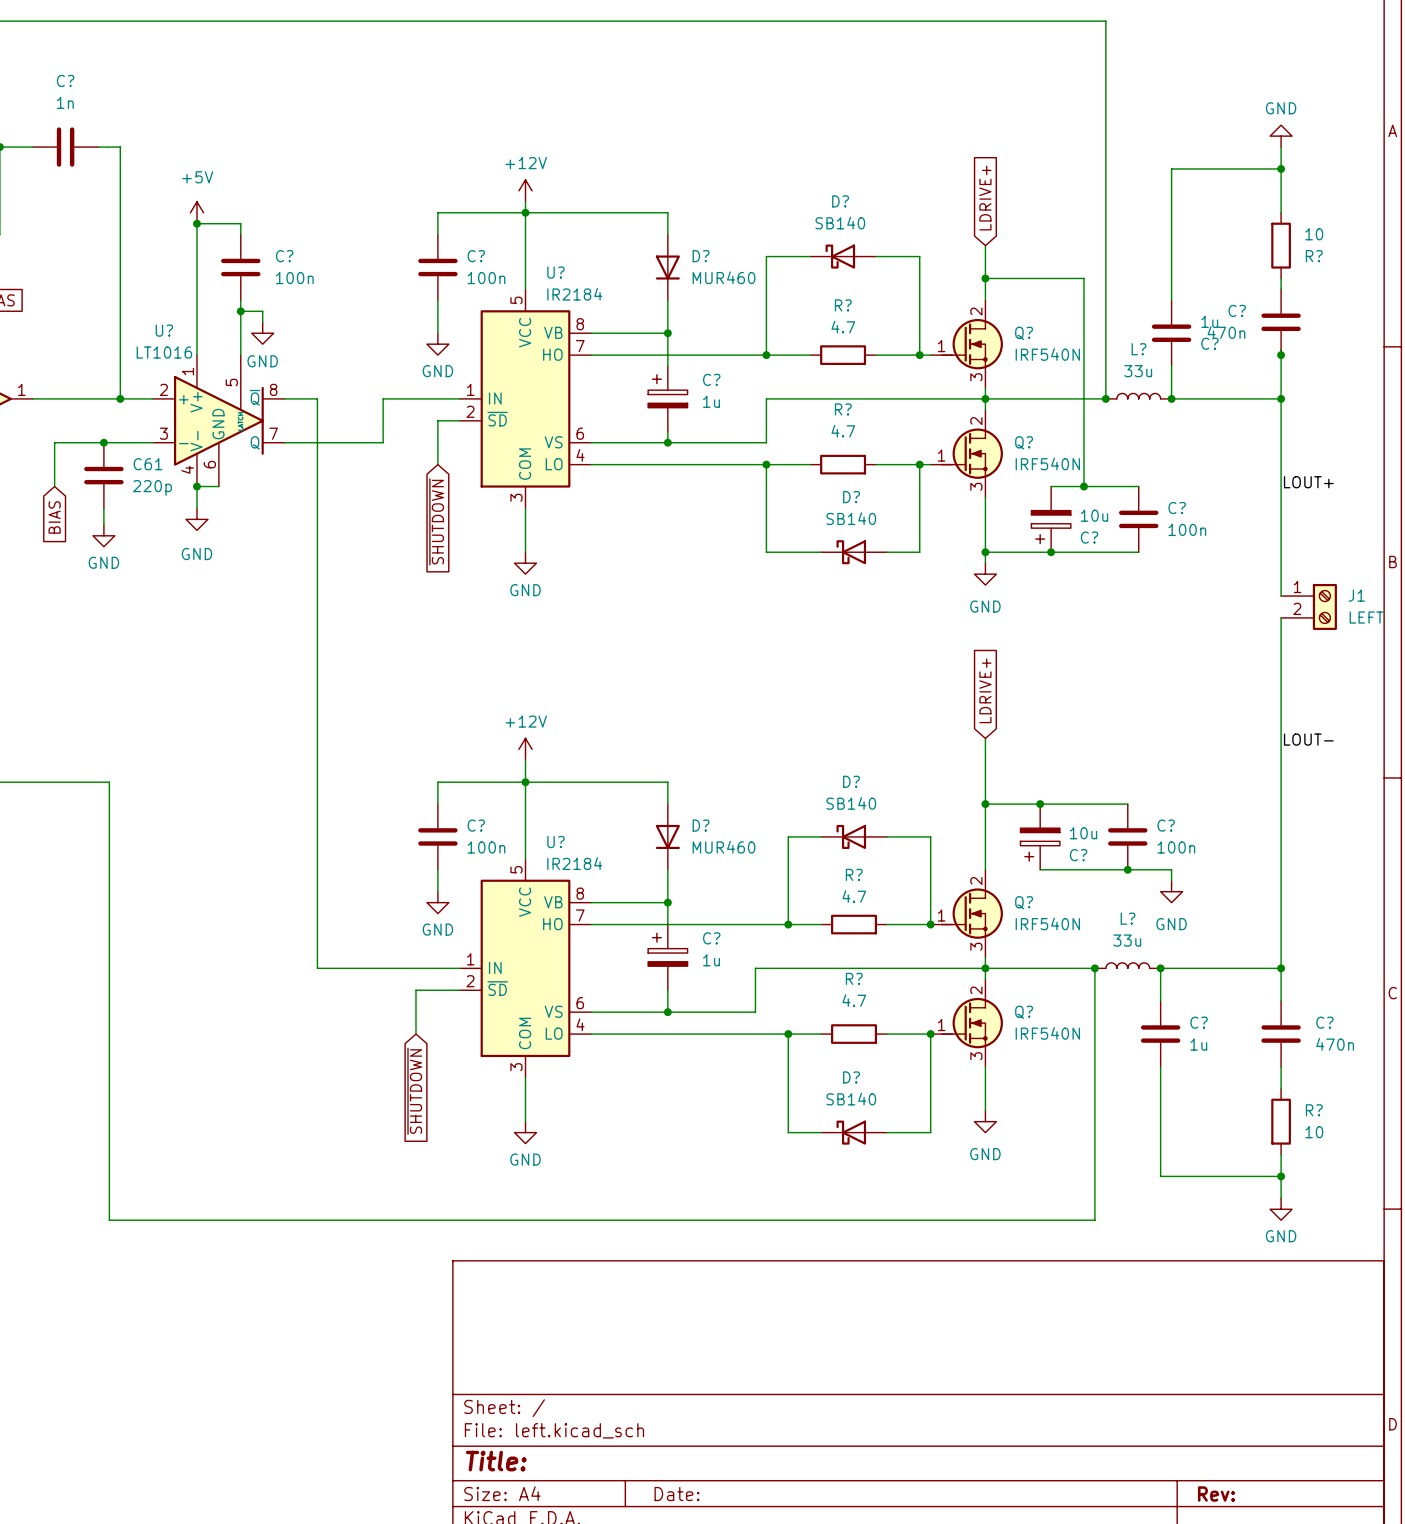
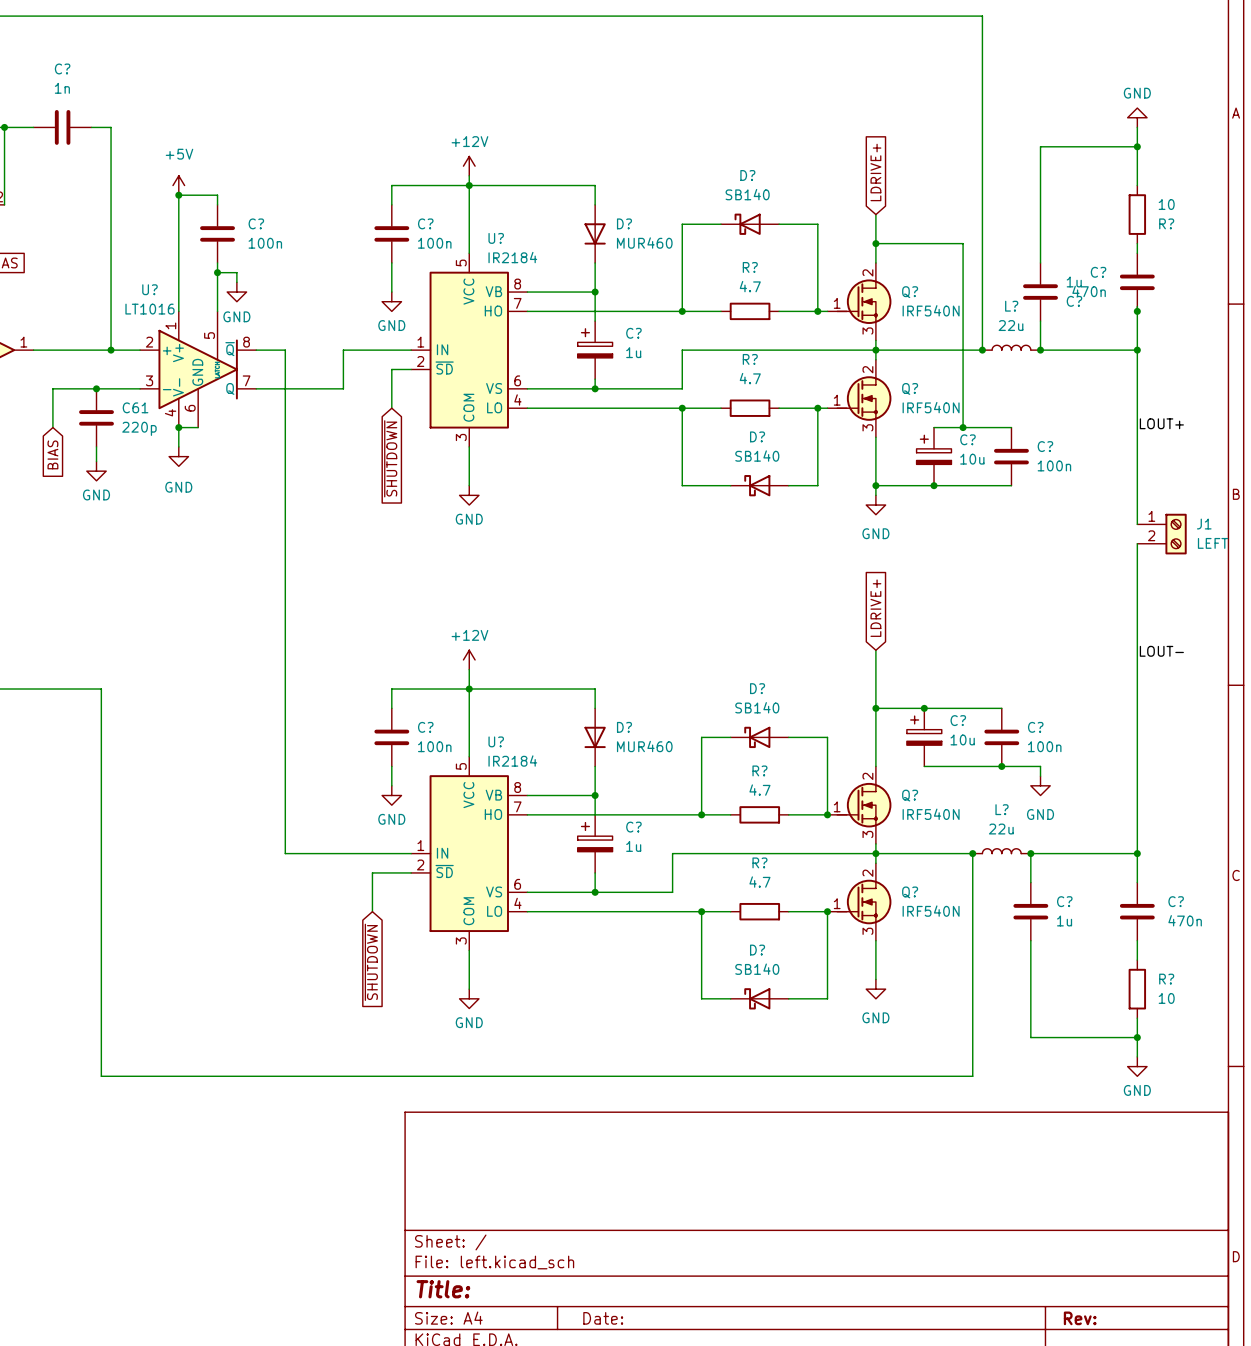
L? value: 33u (1138, 371) -> 22u (1011, 325)
C? flip: as is (1051, 527) -> up-down (934, 449)
C? flip: as is (1040, 844) -> up-down (924, 730)
L? value: 33u (1127, 940) -> 22u (1001, 829)

